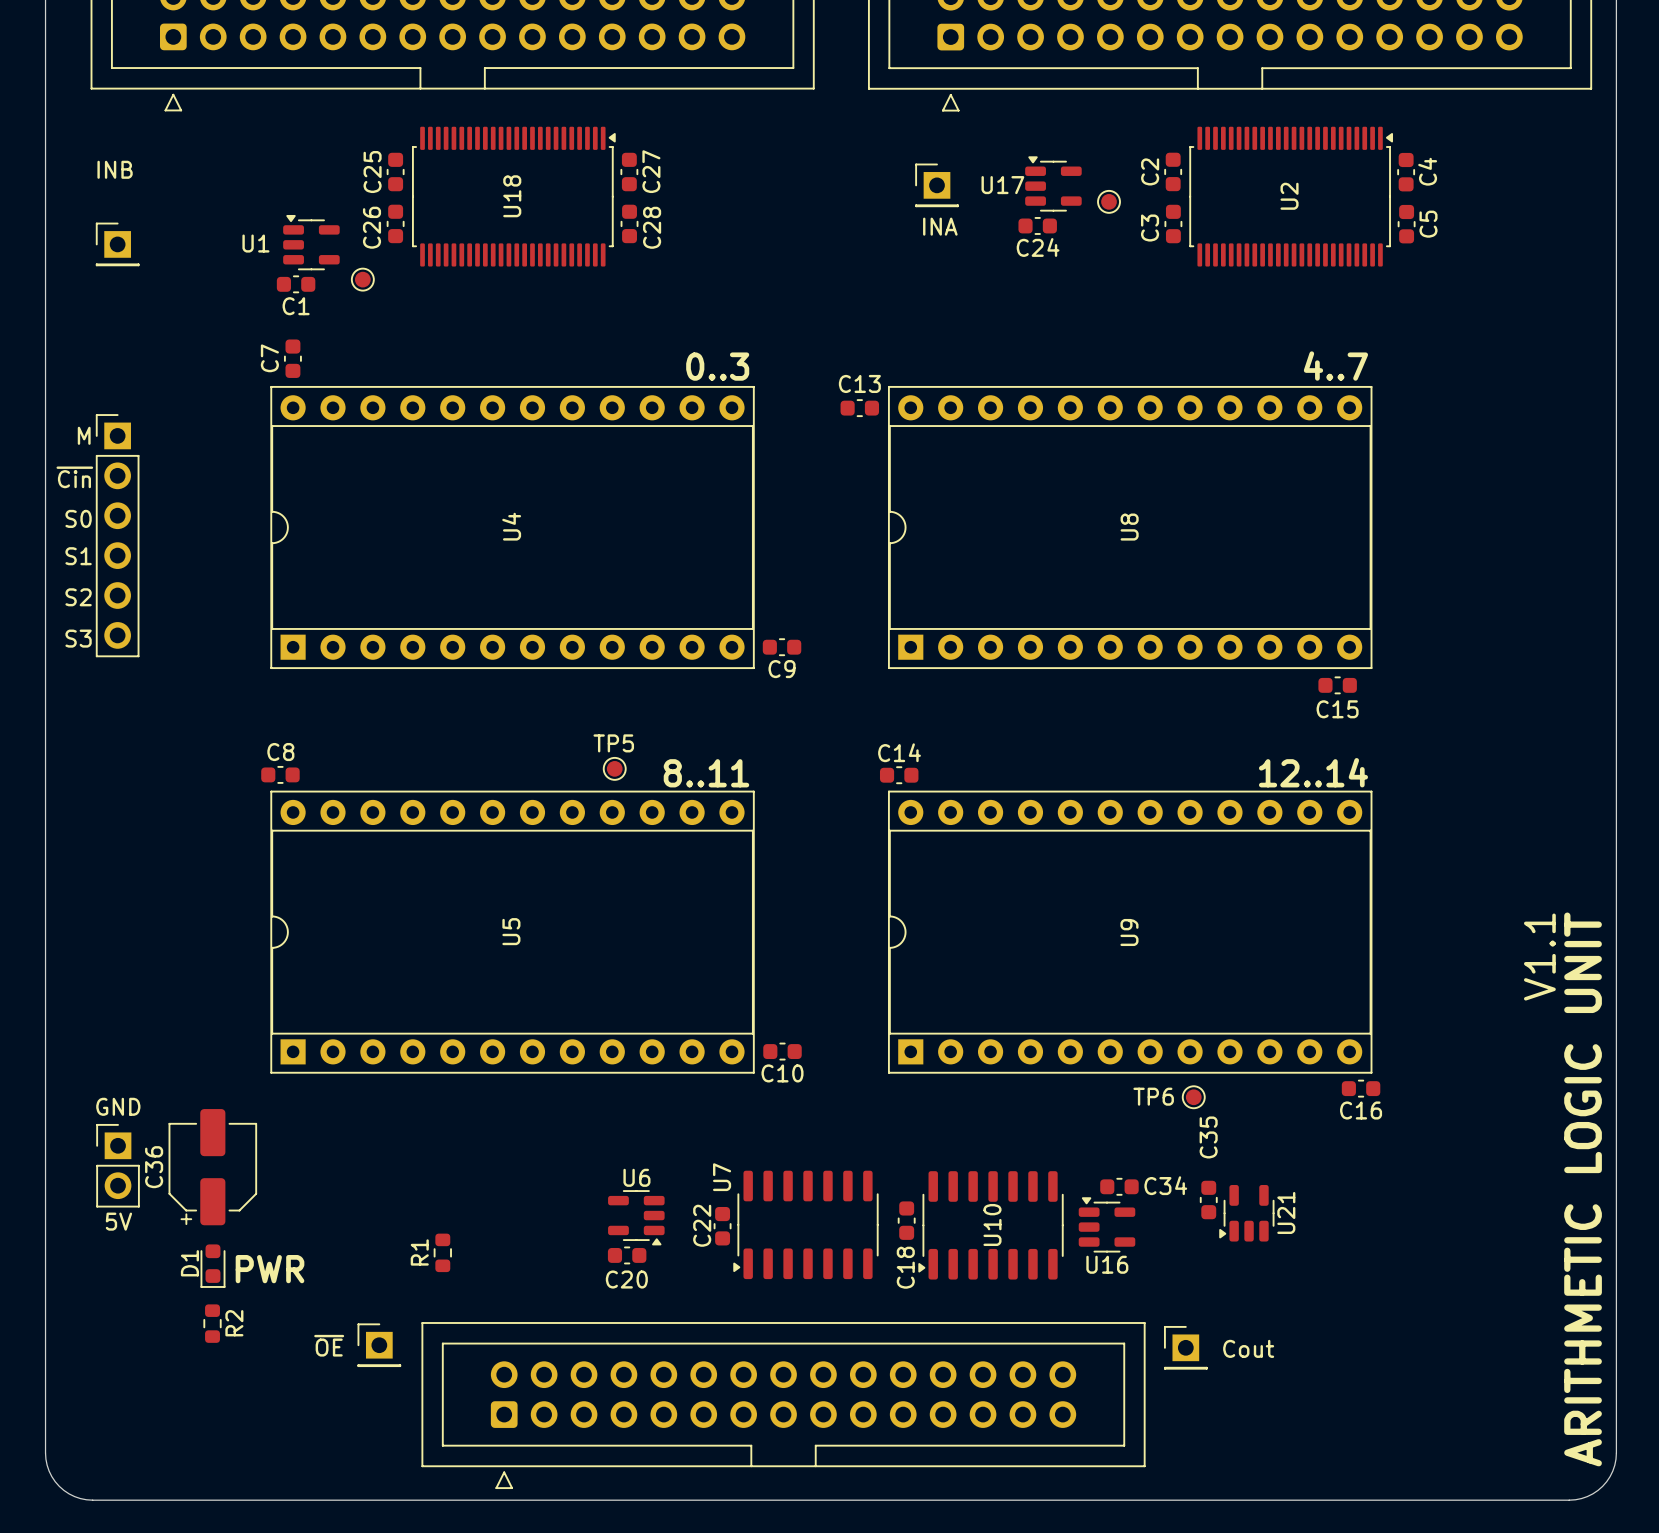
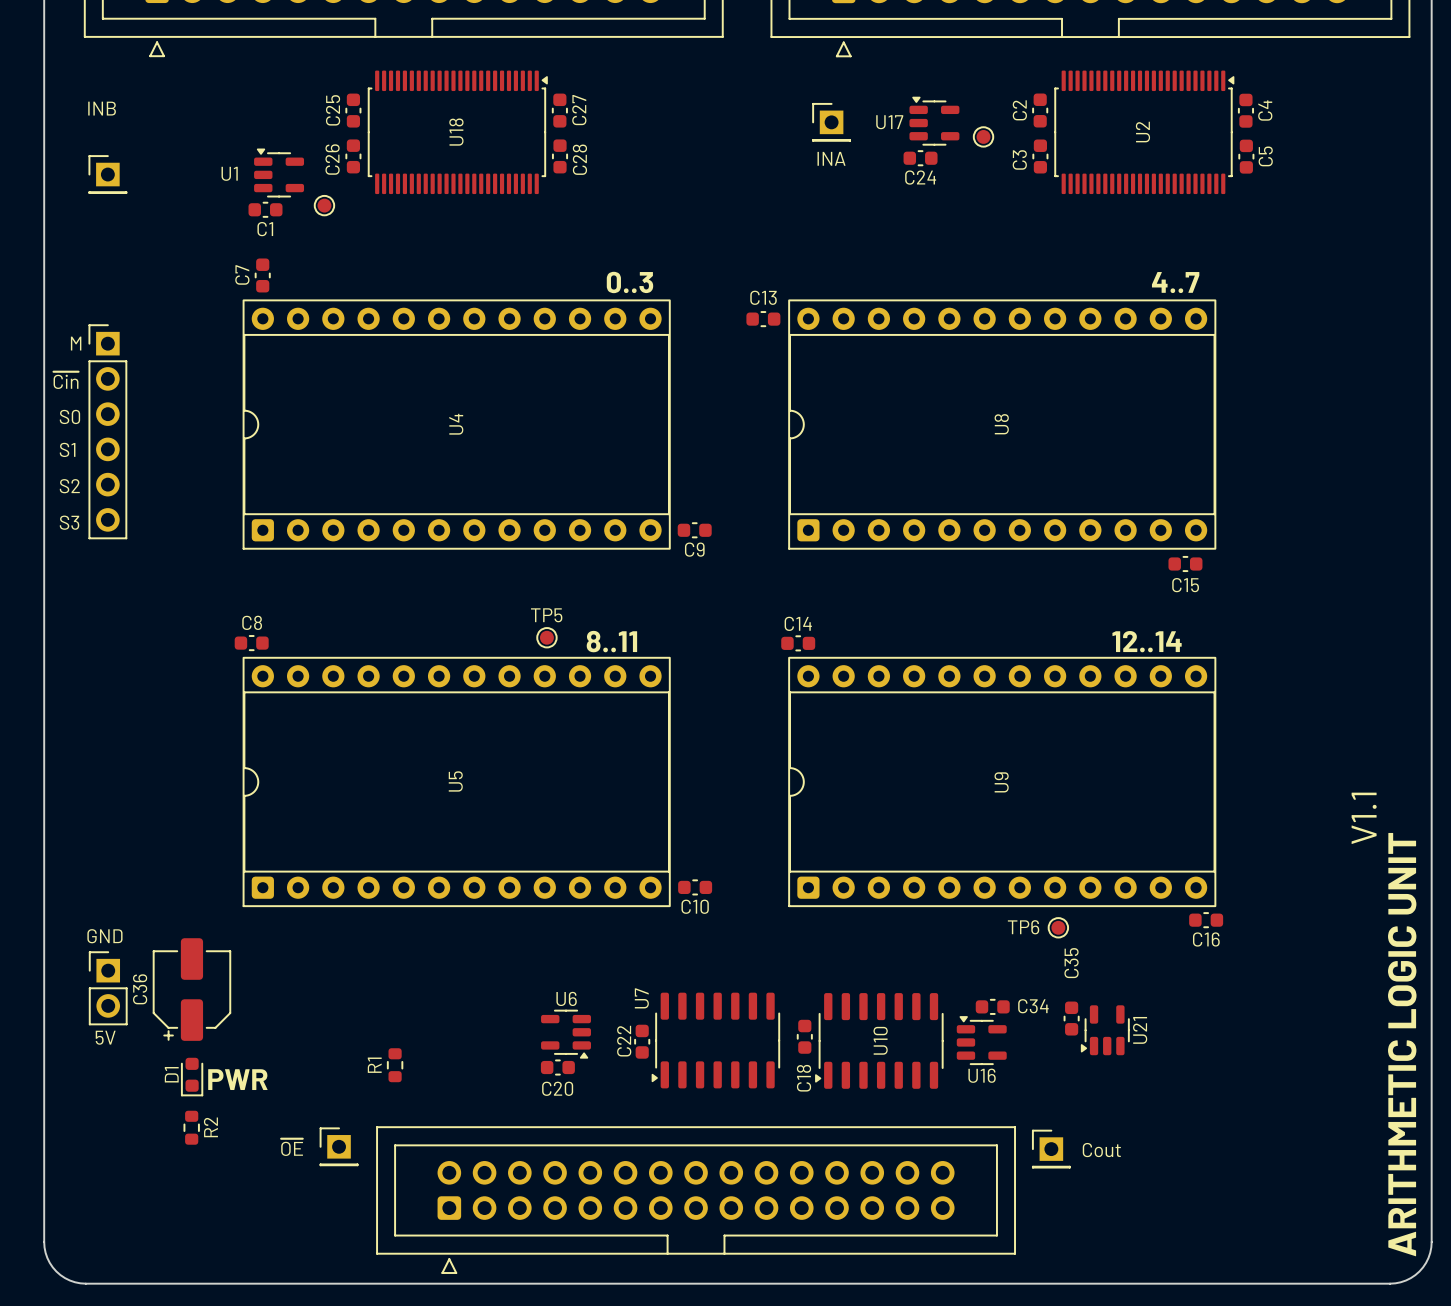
U4 footprint: [270, 385, 755, 670] -> [242, 299, 671, 550]
U8 footprint: [887, 385, 1373, 670] -> [788, 299, 1217, 550]
U5 footprint: [270, 790, 755, 1074] -> [242, 656, 671, 907]
U9 footprint: [887, 790, 1373, 1074] -> [788, 656, 1217, 907]

